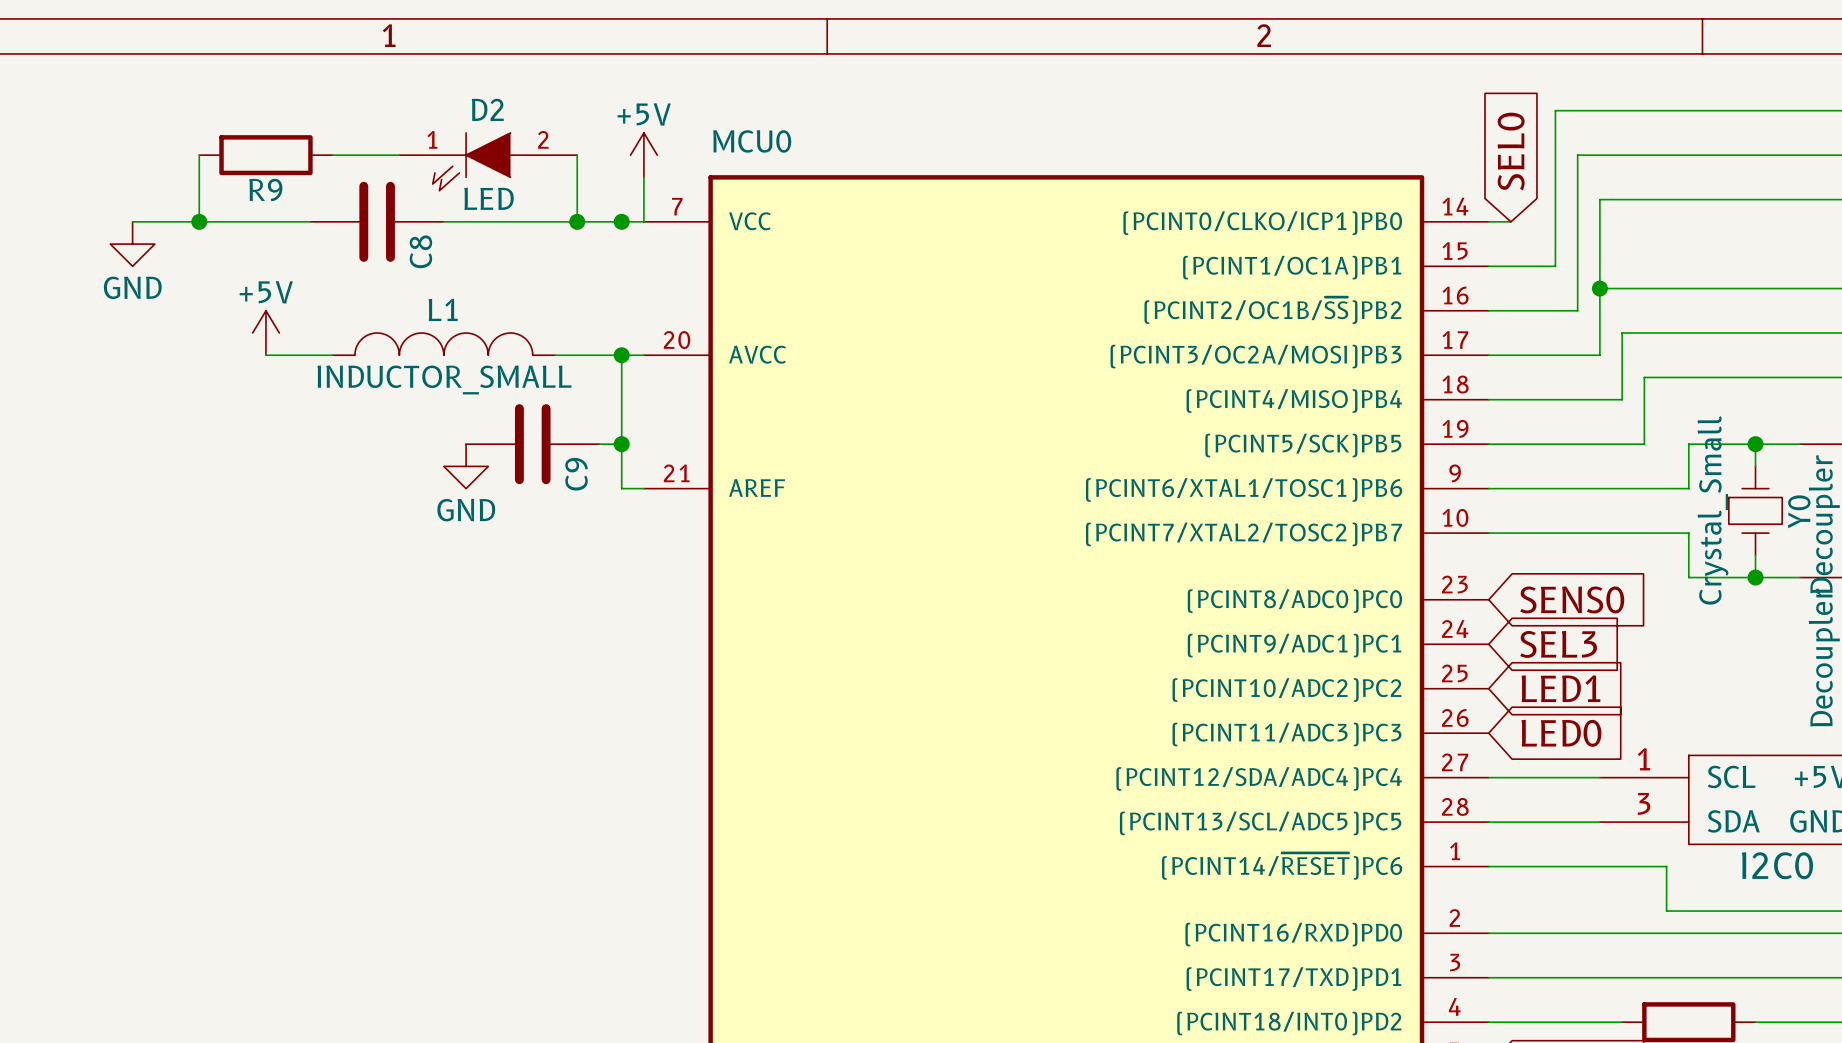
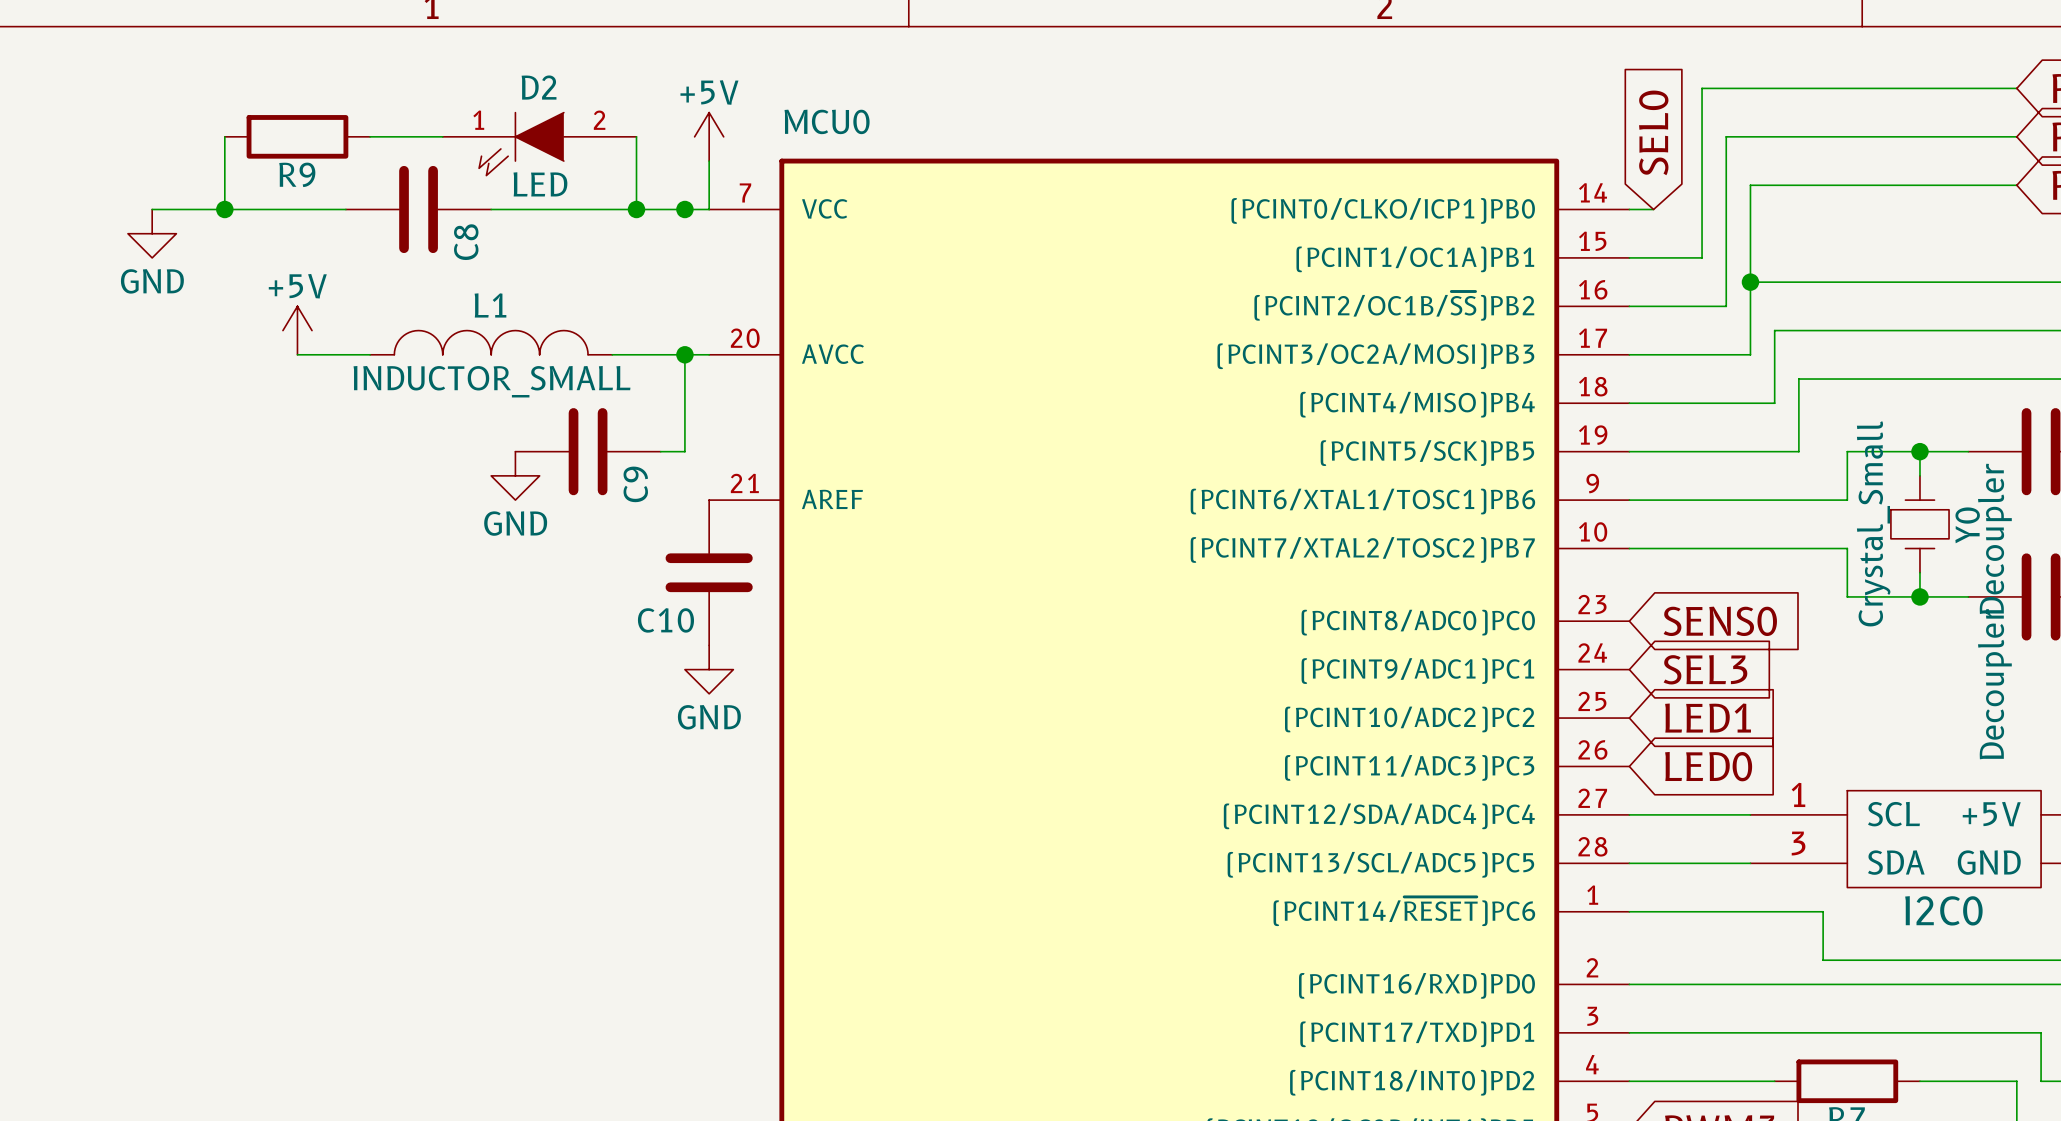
wire: (621, 444) (621, 488) (643, 488) -> none
junction: (621, 444) -> none
C10: none -> (709, 572)
power symbol: none -> GND (709, 669)

